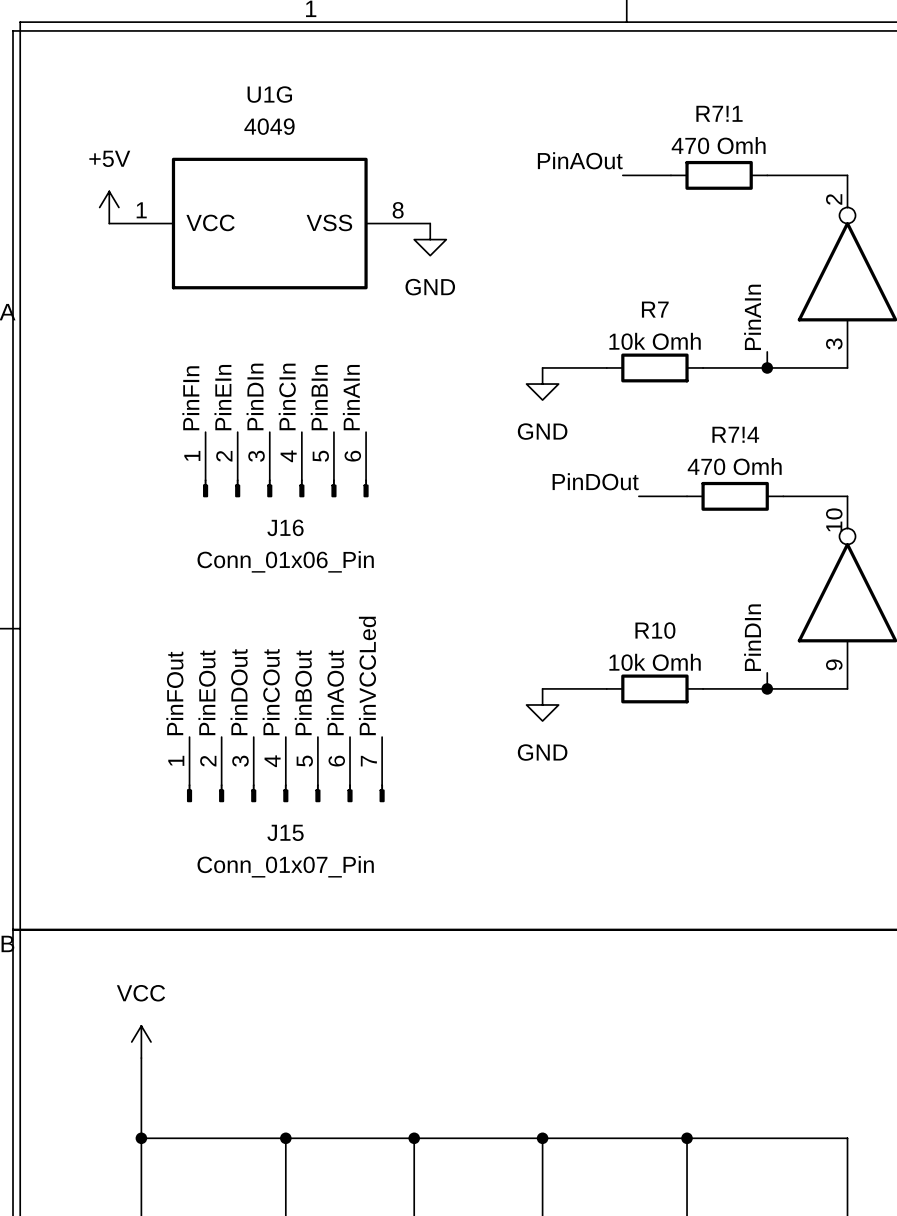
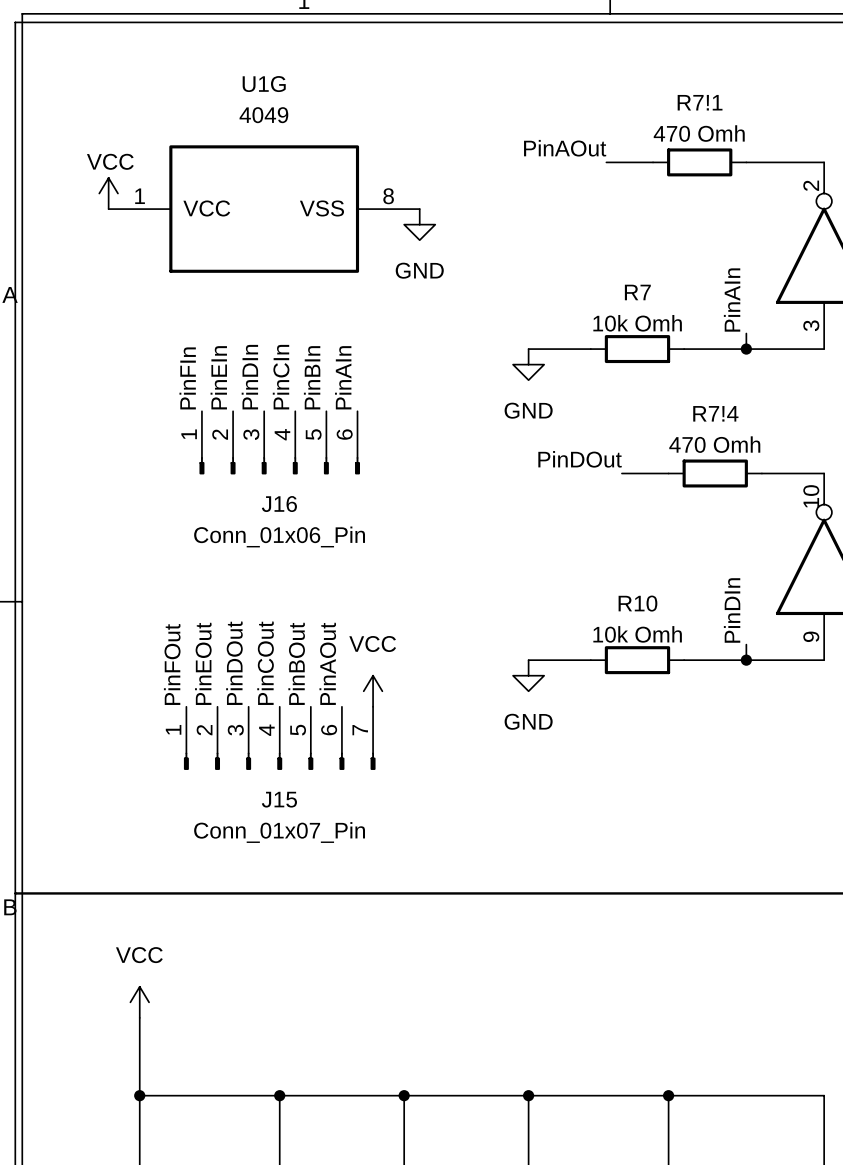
power symbol: +5V (109, 207) -> VCC (108, 193)
label: PinVCCLed (367, 675) -> none
power symbol: none -> VCC (373, 691)

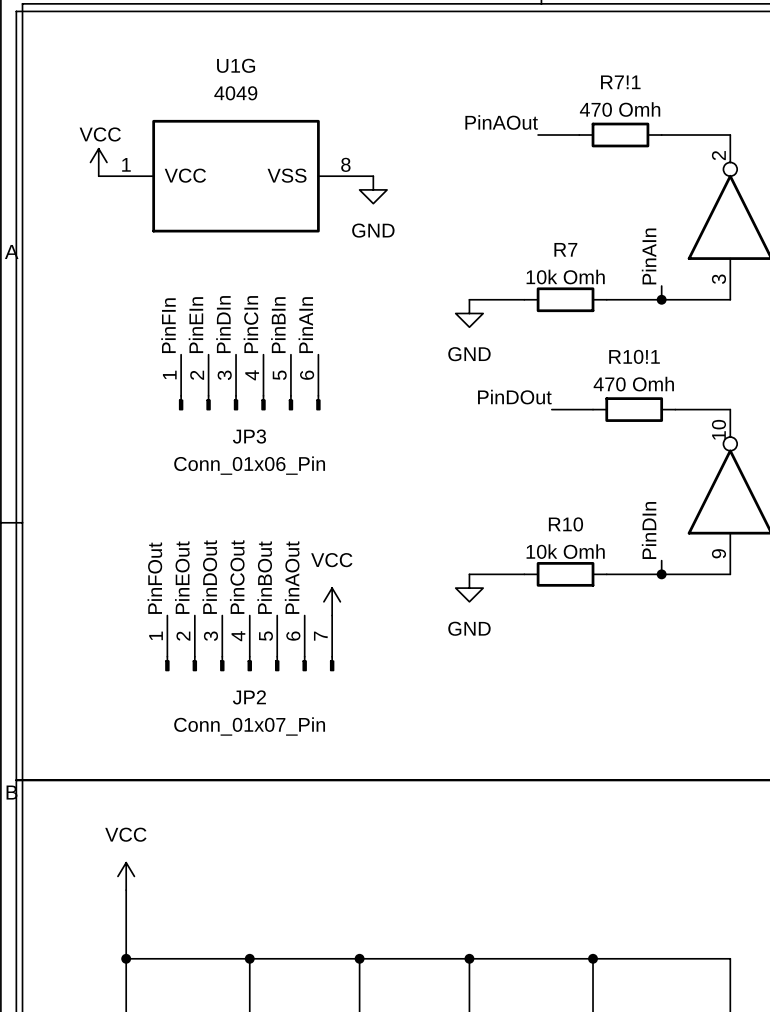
R7!4 name: R7!4 (715, 413) -> R10!1 (634, 356)
J16 name: J16 (279, 504) -> JP3 (249, 436)
J15 name: J15 (279, 799) -> JP2 (249, 697)

